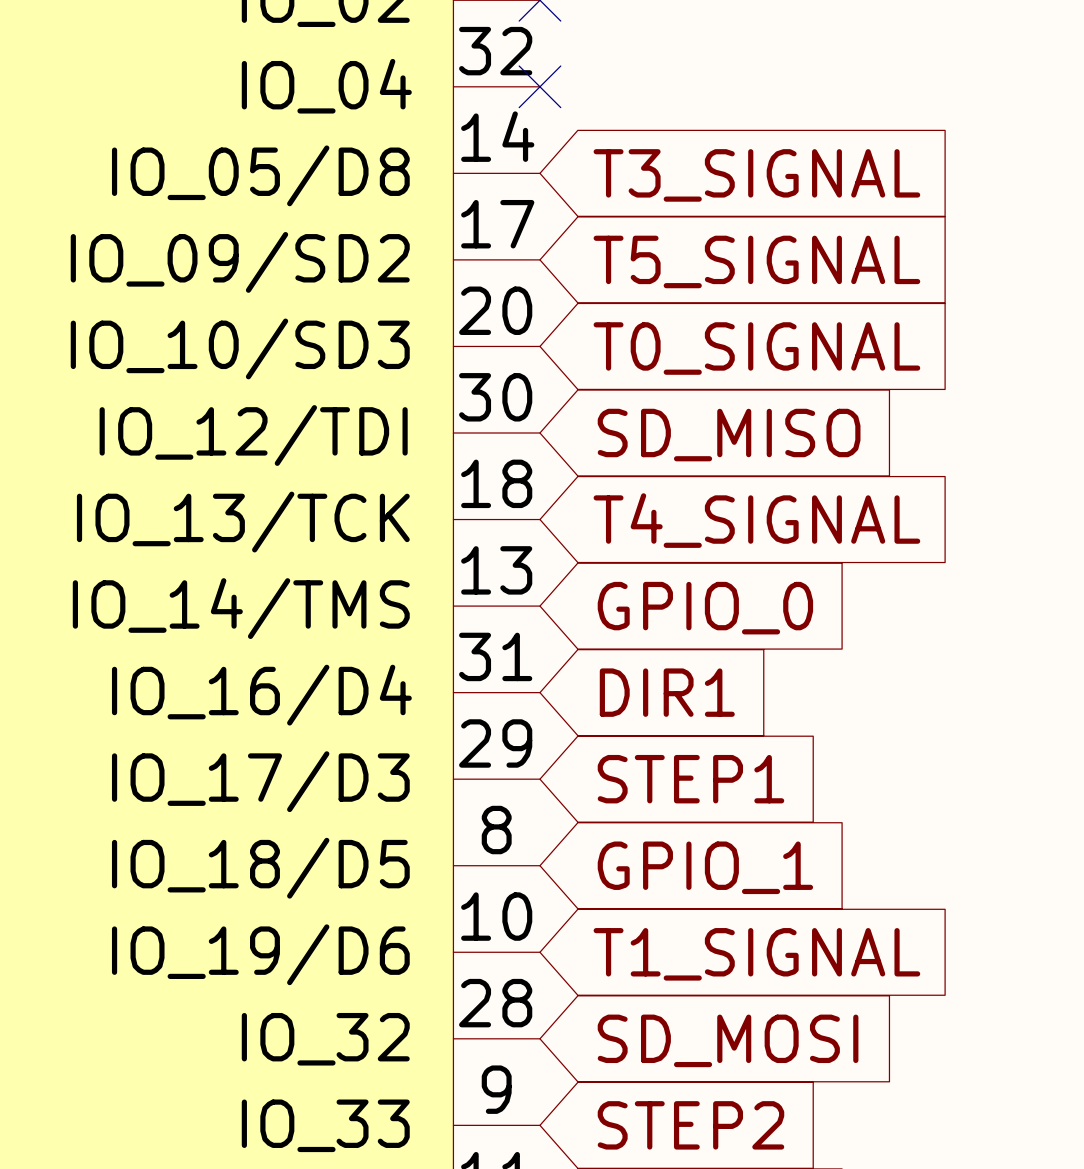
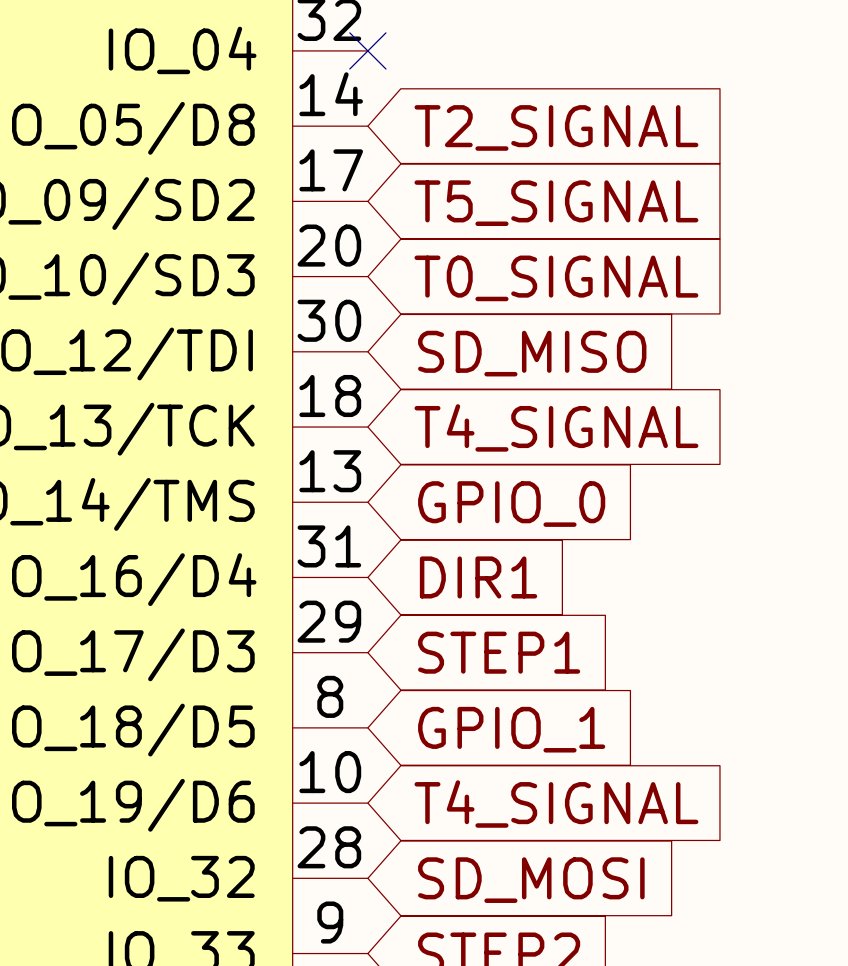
global label: T3_SIGNAL (756, 175) -> T2_SIGNAL (556, 127)
global label: T1_SIGNAL (756, 954) -> T4_SIGNAL (556, 804)

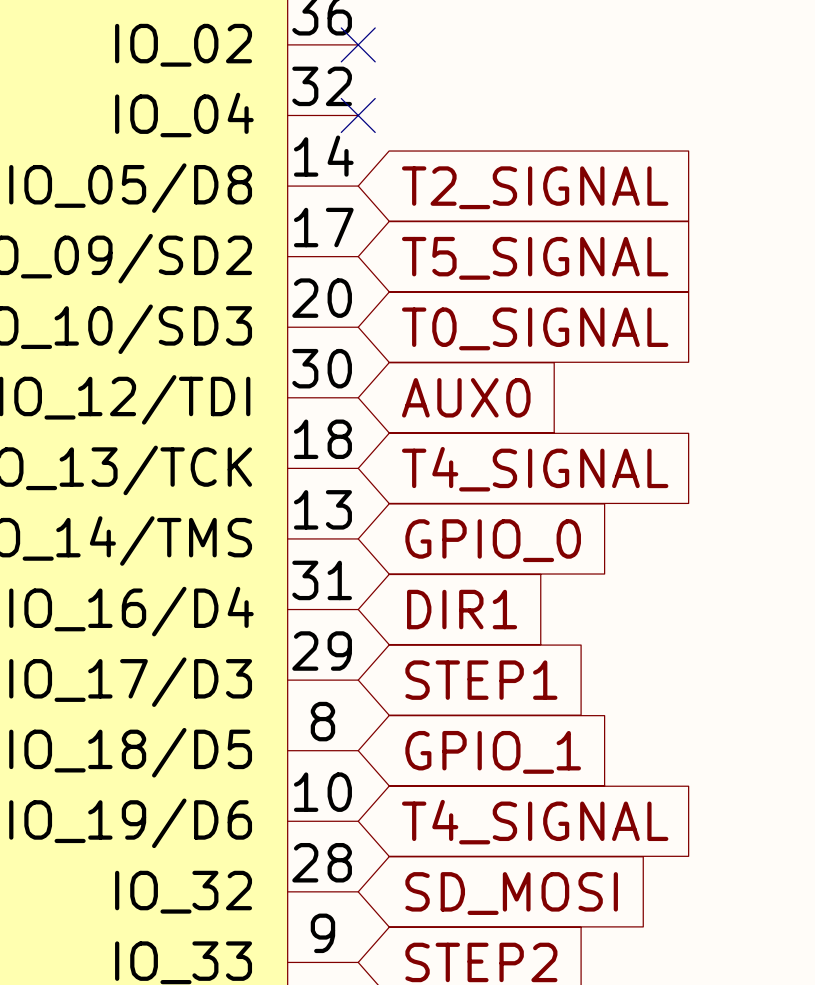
global label: SD_MISO (532, 353) -> AUX0 (466, 397)

